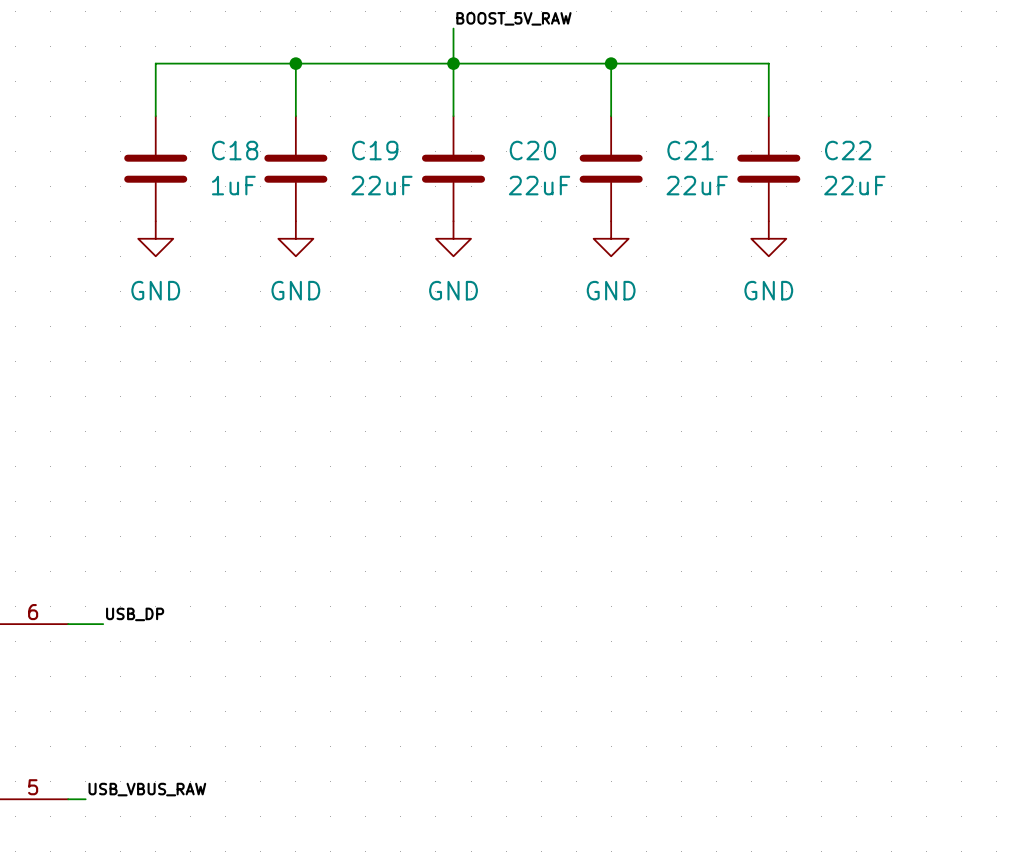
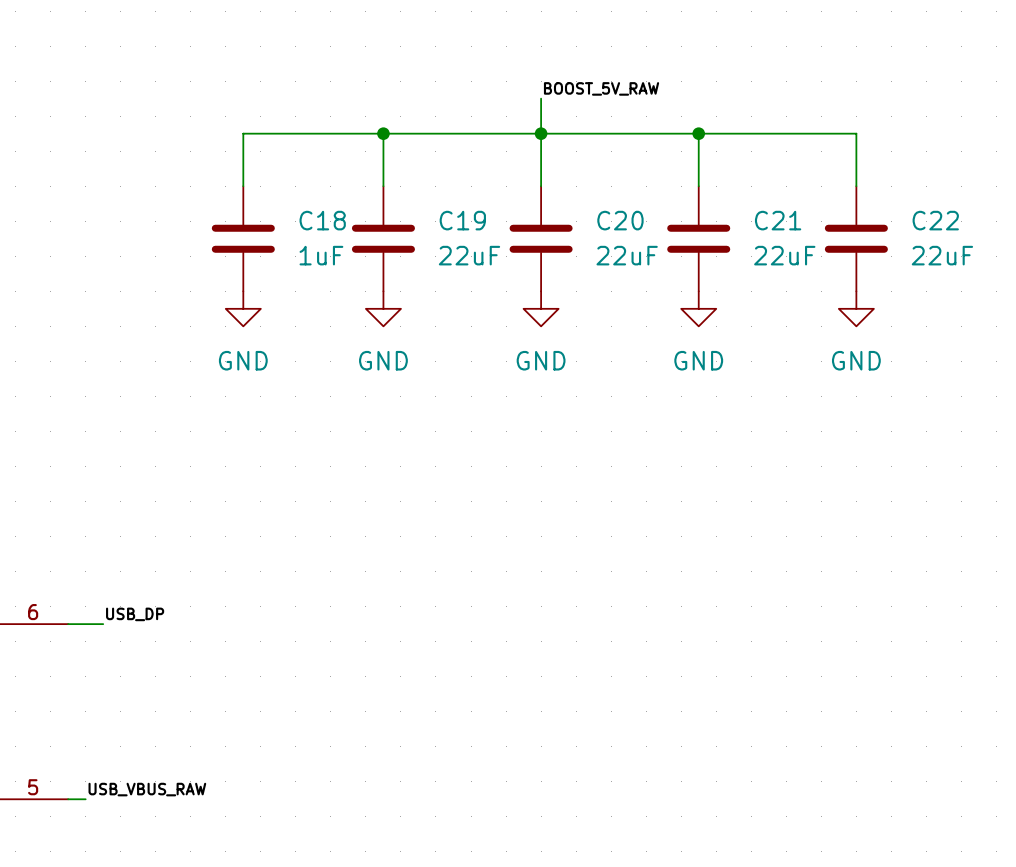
label position: BOOST_5V_RAW (513, 18) -> BOOST_5V_RAW (601, 88)
wire: (453, 28) (453, 116) -> (541, 98) (541, 186)
wire: (295, 63) (295, 116) -> (383, 133) (383, 186)
junction: (295, 63) -> none
junction: (453, 63) -> none
wire: (611, 63) (611, 116) -> (698, 133) (698, 186)
junction: (611, 63) -> none
wire: (155, 116) (155, 63) (768, 63) (768, 116) -> (243, 186) (243, 133) (856, 133) (856, 186)
junction: none -> (383, 133)
junction: none -> (541, 133)
junction: none -> (698, 133)
C18 position: (155, 168) -> (243, 238)
C19 position: (295, 168) -> (383, 238)
C20 position: (453, 168) -> (541, 238)
C21 position: (611, 168) -> (698, 238)
C22 position: (768, 168) -> (856, 238)
power symbol: GND (155, 238) -> none
power symbol: GND (295, 238) -> none
power symbol: GND (453, 238) -> none
power symbol: GND (611, 238) -> none
power symbol: GND (768, 238) -> none
power symbol: none -> GND (243, 308)
power symbol: none -> GND (383, 308)
power symbol: none -> GND (541, 308)
power symbol: none -> GND (698, 308)
power symbol: none -> GND (856, 308)

